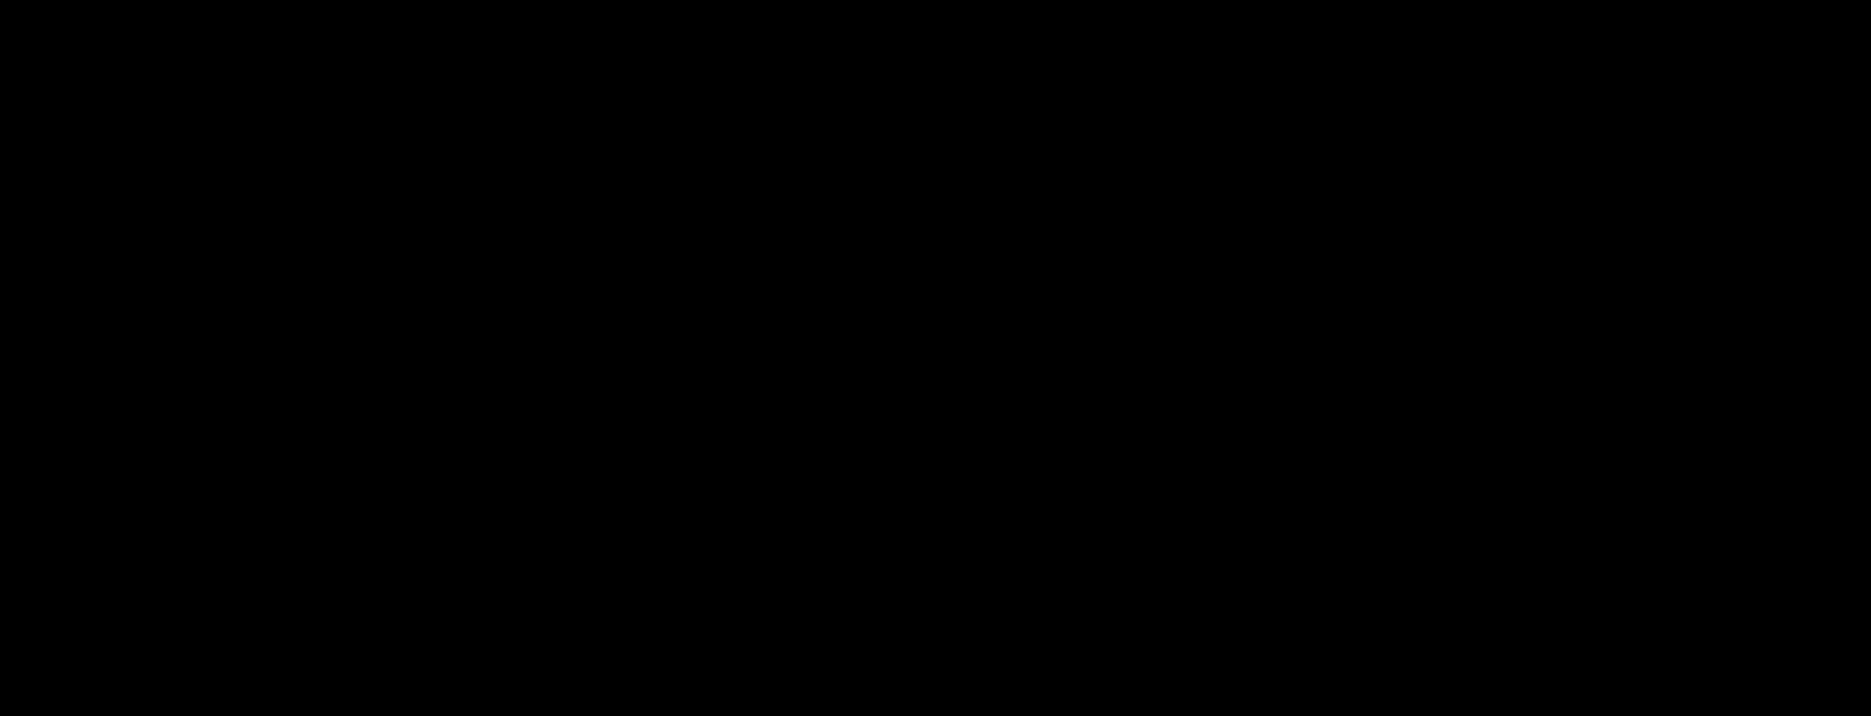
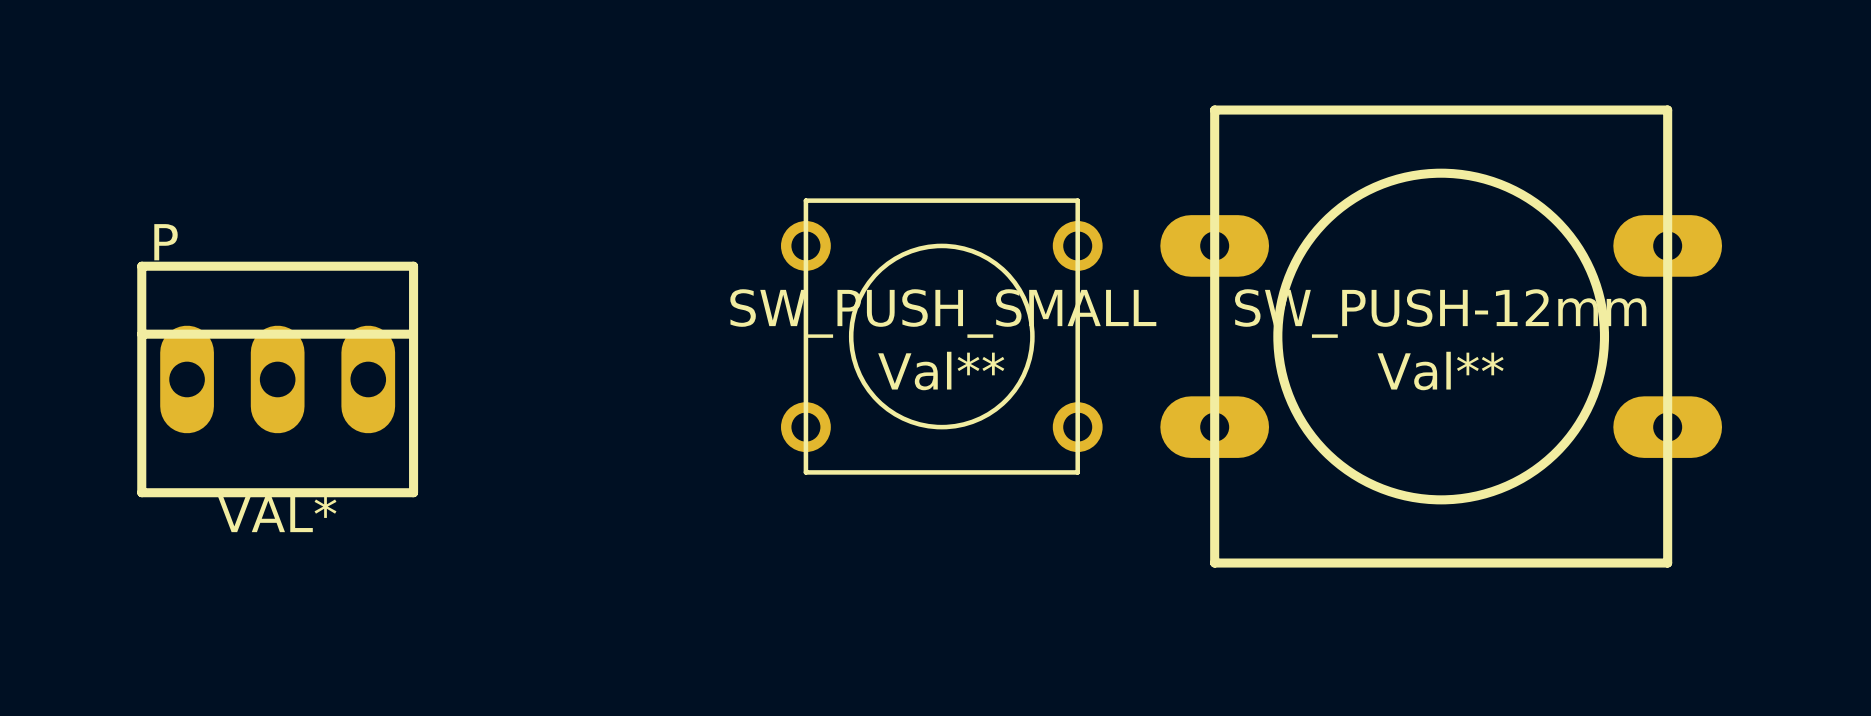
SW_PUSH_SMALL: none -> Val** (941, 336)
SW_PUSH-12mm: none -> Val** (1441, 336)
P: none -> VAL* (277, 379)

